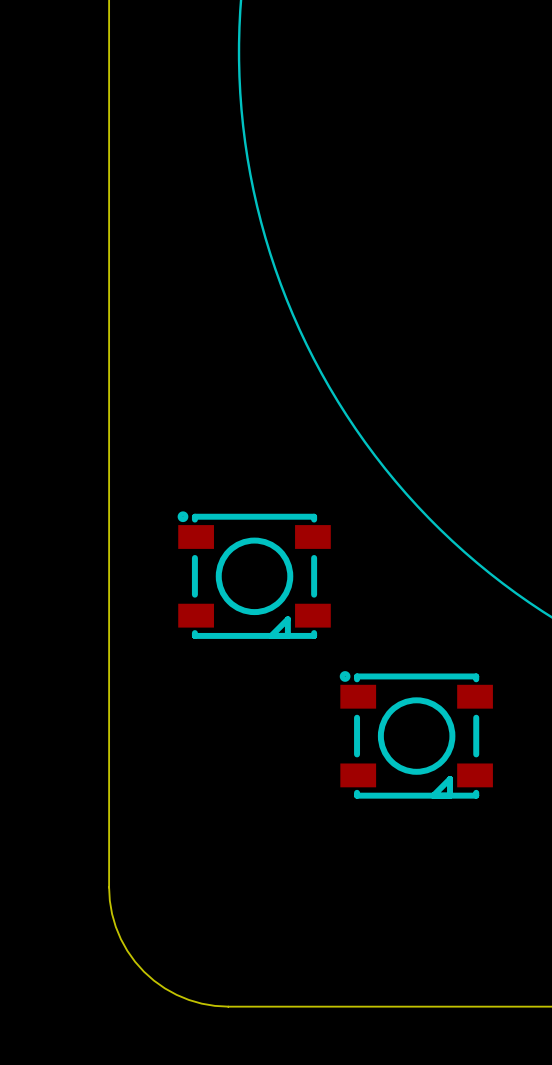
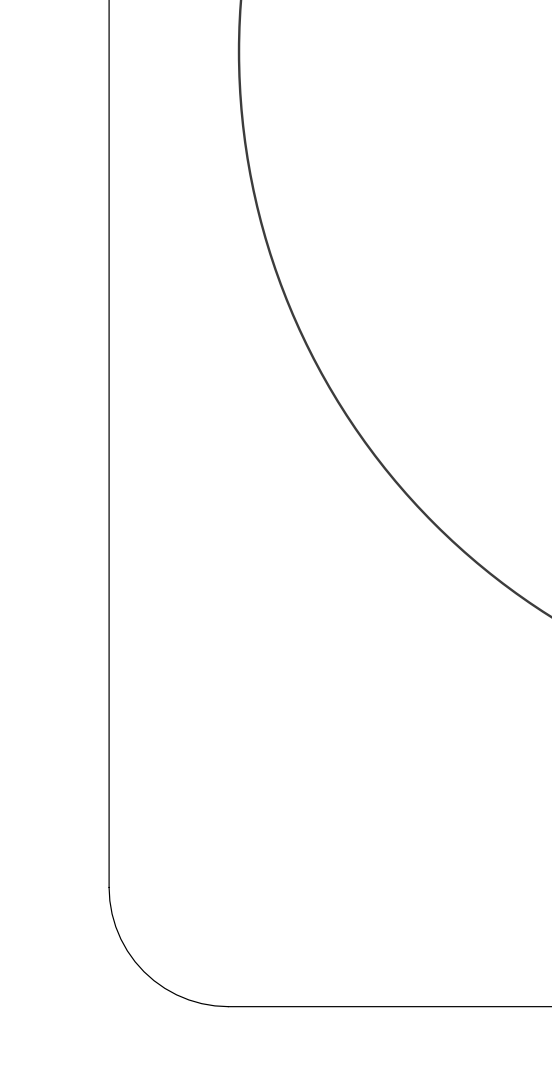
part: (254, 575) -> none
part: (416, 734) -> none

